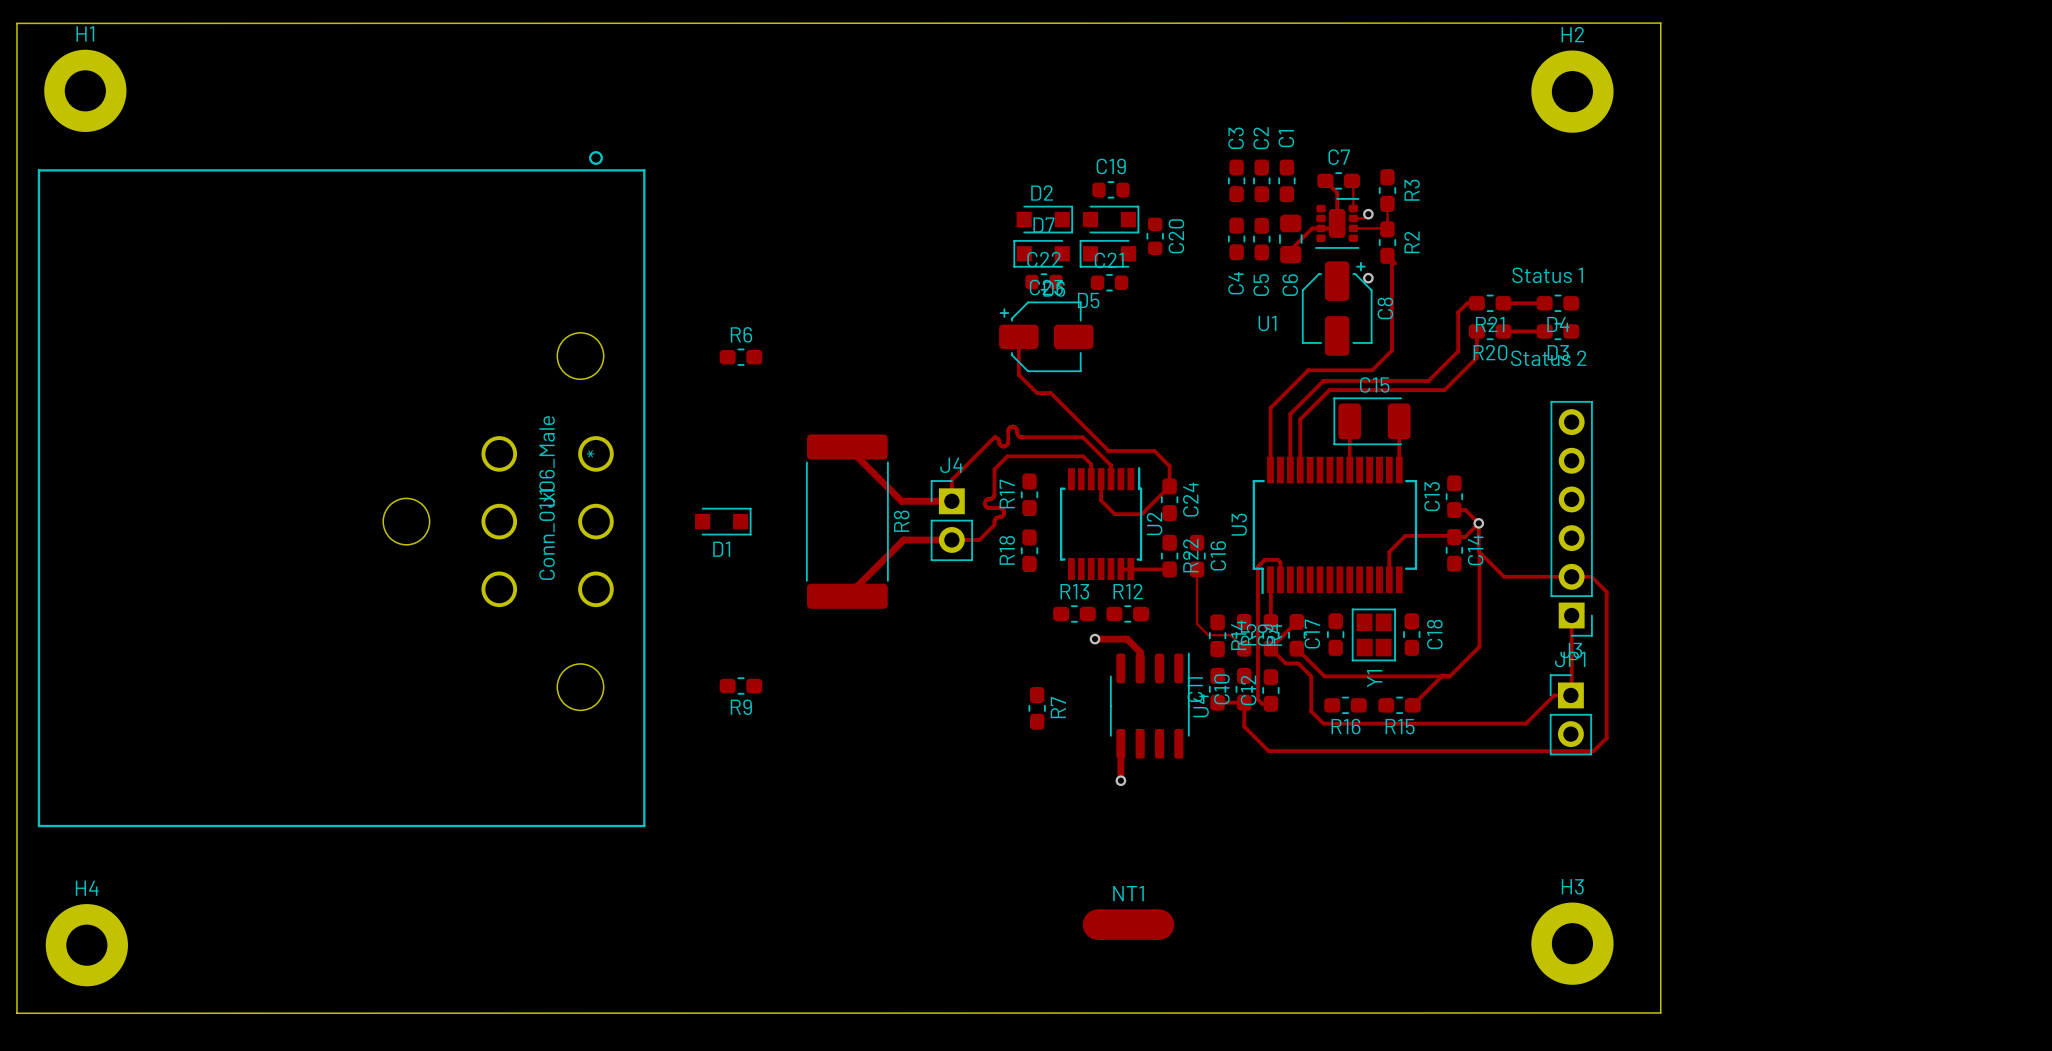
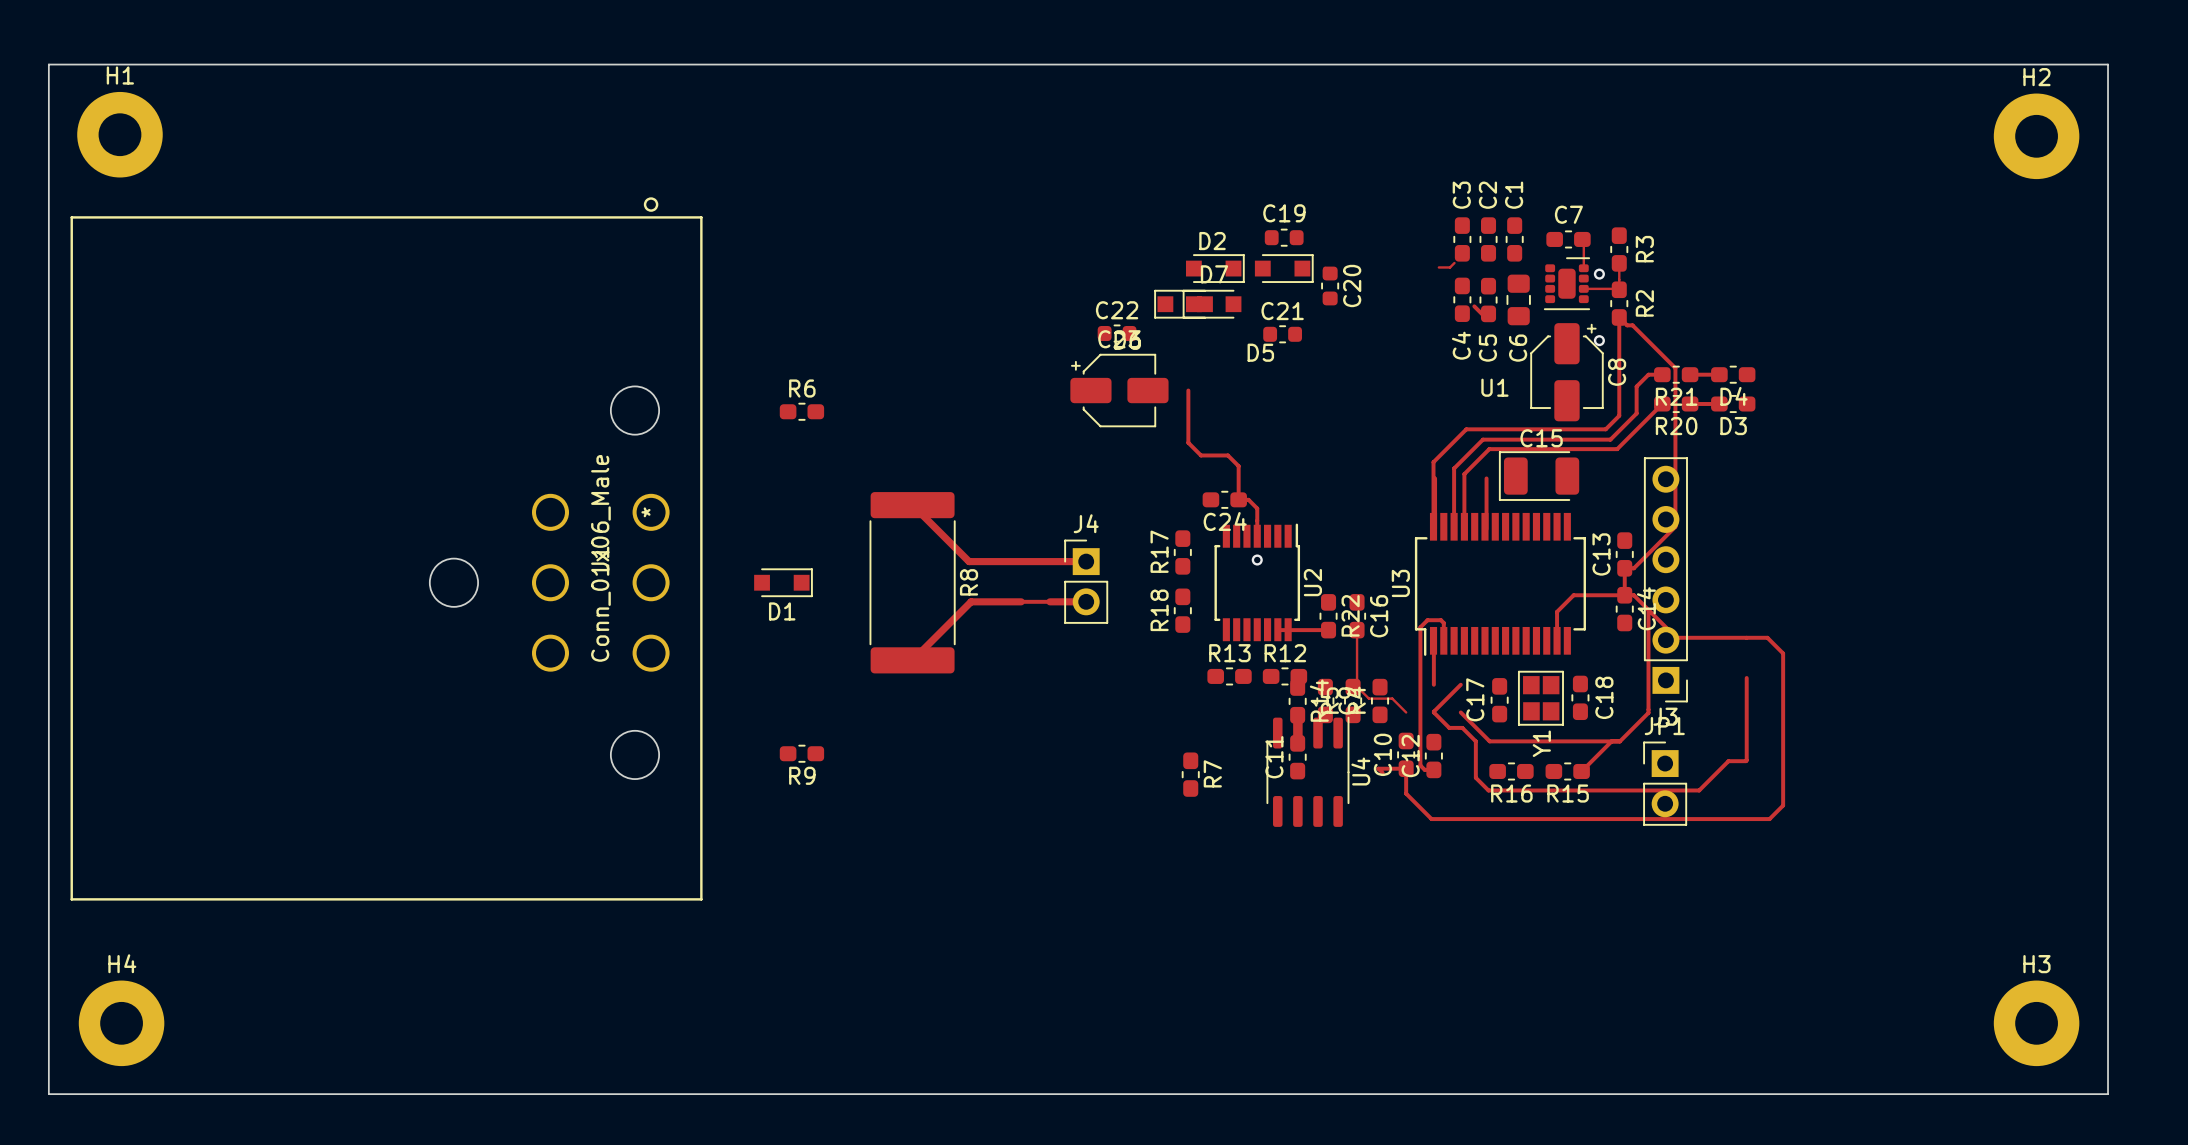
board edge: (16, 23) (1660, 23) (1660, 1012) (16, 1013) -> (48, 64) (2108, 64) (2108, 1094) (48, 1094)
H2 position: (1572, 91) -> (2036, 136)
C3 position: (1236, 180) -> (1462, 239)
C2 position: (1261, 180) -> (1488, 239)
C1 position: (1286, 180) -> (1514, 239)
track: (1325, 180) (1337, 192) (1337, 223) (1332, 228) (1312, 228) (1290, 249) (1290, 254) -> none
C7 position: (1338, 180) -> (1568, 239)
track: (1350, 180) (1353, 183) (1353, 208) -> (1580, 239) (1583, 242) (1583, 268)
C19 position: (1111, 189) -> (1284, 237)
R3 position: (1387, 190) -> (1619, 249)
track: (1387, 203) (1387, 229) (1353, 228) -> (1619, 263) (1619, 289) (1583, 288)
via: (1368, 214) -> none
D2 position: (1044, 219) -> (1215, 268)
D5 position: (1111, 219) -> (1284, 268)
U1 position: (1337, 223) -> (1566, 283)
via: none -> (1599, 274)
C20 position: (1155, 236) -> (1330, 285)
C4 position: (1236, 238) -> (1462, 299)
C5 position: (1261, 239) -> (1488, 300)
C6 position: (1290, 239) -> (1518, 299)
R2 position: (1387, 242) -> (1619, 303)
D7 position: (1041, 253) -> (1212, 304)
track: (1391, 260) (1391, 350) (1372, 370) (1308, 370) (1270, 407) (1270, 470) -> none
text: Status 1 (1547, 275) -> none
via: (1368, 278) -> none
C21 position: (1109, 282) -> (1282, 334)
via: none -> (1599, 340)
track: (1476, 303) (1467, 303) (1458, 312) (1458, 351) (1428, 380) (1323, 380) (1290, 414) (1290, 470) -> none
R21 position: (1490, 303) -> (1676, 374)
track: (1503, 303) (1544, 303) -> none
D4 position: (1557, 303) -> (1733, 374)
C8 position: (1337, 308) -> (1566, 372)
track: none -> (1662, 374) (1648, 374) (1636, 386) (1636, 413) (1610, 439) (1482, 439) (1454, 468) (1454, 526)
track: none -> (1690, 374) (1719, 374)
track: (1473, 331) (1476, 331) (1476, 357) (1444, 390) (1329, 390) (1300, 419) (1300, 470) -> none
R20 position: (1490, 331) -> (1676, 403)
track: (1503, 331) (1544, 331) -> none
D3 position: (1557, 331) -> (1733, 403)
track: (1018, 336) (1018, 374) (1037, 393) (1050, 393) (1108, 451) (1154, 451) (1169, 466) (1169, 486) (1141, 514) (1114, 514) (1101, 500) (1101, 479) -> none
track: none -> (1188, 390) (1188, 442) (1201, 455) (1227, 455) (1238, 466) (1238, 499) (1248, 499) (1257, 508) (1257, 536)
track: none -> (1662, 403) (1617, 449) (1489, 449) (1464, 474) (1464, 526)
track: none -> (1690, 403) (1719, 403)
text: Status 2 (1548, 358) -> none
C15 position: (1372, 421) -> (1539, 476)
track: none -> (1433, 526) (1433, 462) (1466, 429) (1605, 429) (1619, 415) (1619, 317) (1627, 325) (1632, 325) (1675, 368) (1675, 526) (1633, 568) (1624, 568) (1624, 595)
track: (1091, 479) (1091, 464) (1083, 456) (1007, 456) (994, 469) (994, 495) (986, 499) (984, 503) (988, 508) (1001, 508) (1003, 513) (995, 518) (994, 524) (979, 539) -> (1086, 601) (1049, 601)
track: (1111, 479) (1111, 465) (1082, 437) (1020, 437) (1017, 434) (1016, 428) (1011, 426) (1008, 430) (1006, 445) (1000, 445) (998, 439) (994, 437) (951, 479) (951, 501) -> (1086, 561) (1021, 561)
R17 position: (1029, 494) -> (1182, 552)
C13 position: (1454, 496) -> (1624, 554)
C24 rotation: 0° (1169, 499) -> 90° clockwise (1224, 499)
C24 position: (1169, 499) -> (1224, 499)
via: none -> (1257, 560)
track: (1454, 510) (1465, 510) (1478, 523) -> none
J4 position: (951, 520) -> (1086, 581)
U2 position: (1101, 523) -> (1257, 582)
track: (1478, 523) (1465, 537) (1454, 537) -> none
track: (1478, 523) (1478, 551) (1504, 576) (1591, 576) (1606, 591) (1606, 738) (1593, 751) (1268, 751) (1244, 726) (1244, 702) (1217, 702) (1221, 706) -> none
via: (1478, 523) -> none
U3 position: (1334, 525) -> (1500, 584)
track: (1454, 535) (1405, 535) (1389, 551) (1389, 579) -> none
track: none -> (1648, 609) (1648, 712) (1619, 741) (1489, 741) (1460, 712)
R18 position: (1029, 550) -> (1182, 610)
C14 position: (1454, 550) -> (1624, 609)
track: (1479, 552) (1479, 646) (1449, 676) (1324, 676) (1296, 648) -> none
R22 position: (1169, 556) -> (1328, 616)
C16 position: (1197, 556) -> (1357, 616)
track: (1120, 569) (1169, 569) -> (1277, 629) (1328, 630)
track: (1197, 569) (1197, 623) (1208, 635) (1230, 635) (1244, 648) -> (1357, 630) (1357, 686) (1368, 698) (1392, 698) (1406, 712)
track: none -> (1557, 640) (1557, 611) (1573, 595) (1633, 595) (1676, 637) (1767, 637) (1783, 653) (1783, 805) (1769, 819) (1431, 819) (1406, 793) (1406, 768) (1378, 768) (1382, 772)
track: (1270, 579) (1270, 621) -> (1433, 640) (1433, 684)
track: (1280, 579) (1280, 562) (1277, 559) (1264, 559) (1257, 566) (1257, 699) (1262, 703) (1270, 703) -> (1443, 640) (1443, 623) (1441, 620) (1427, 620) (1420, 627) (1420, 765) (1424, 769) (1433, 769)
R13 position: (1074, 613) -> (1229, 676)
R12 position: (1127, 613) -> (1284, 676)
track: (1571, 615) (1571, 694) (1554, 695) (1525, 723) (1323, 723) (1311, 711) (1311, 676) (1298, 663) (1285, 663) (1270, 648) (1296, 621) -> (1746, 678) (1746, 760) (1728, 761) (1699, 790) (1488, 790) (1475, 777) (1475, 741) (1462, 727) (1449, 727) (1433, 712) (1460, 684)
C18: none -> (1580, 697)
C17: (1335, 634) -> none
Y1 position: (1373, 634) -> (1540, 698)
C18 name: C18 (1434, 634) -> C17 (1475, 699)
track: (1095, 639) (1127, 639) (1140, 652) (1140, 668) -> none
via: (1095, 639) -> none
track: (1441, 676) (1412, 705) -> (1611, 741) (1581, 771)
C10 position: (1244, 689) -> (1406, 754)
C12 position: (1270, 690) -> (1433, 756)
U4 position: (1149, 705) -> (1307, 771)
R16 position: (1345, 705) -> (1511, 771)
R15 position: (1399, 705) -> (1567, 771)
R7 position: (1037, 708) -> (1190, 774)
track: (1120, 743) (1120, 780) -> none
via: (1120, 780) -> none
NT1: (1128, 924) -> none
H3 position: (1572, 943) -> (2036, 1023)

